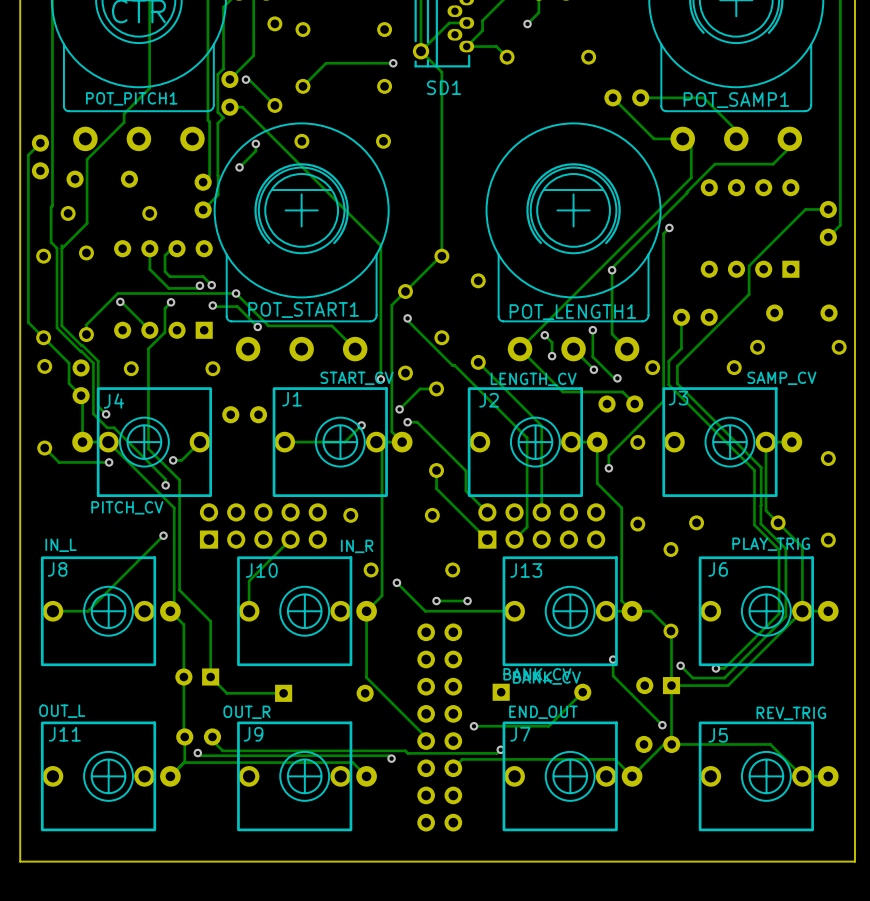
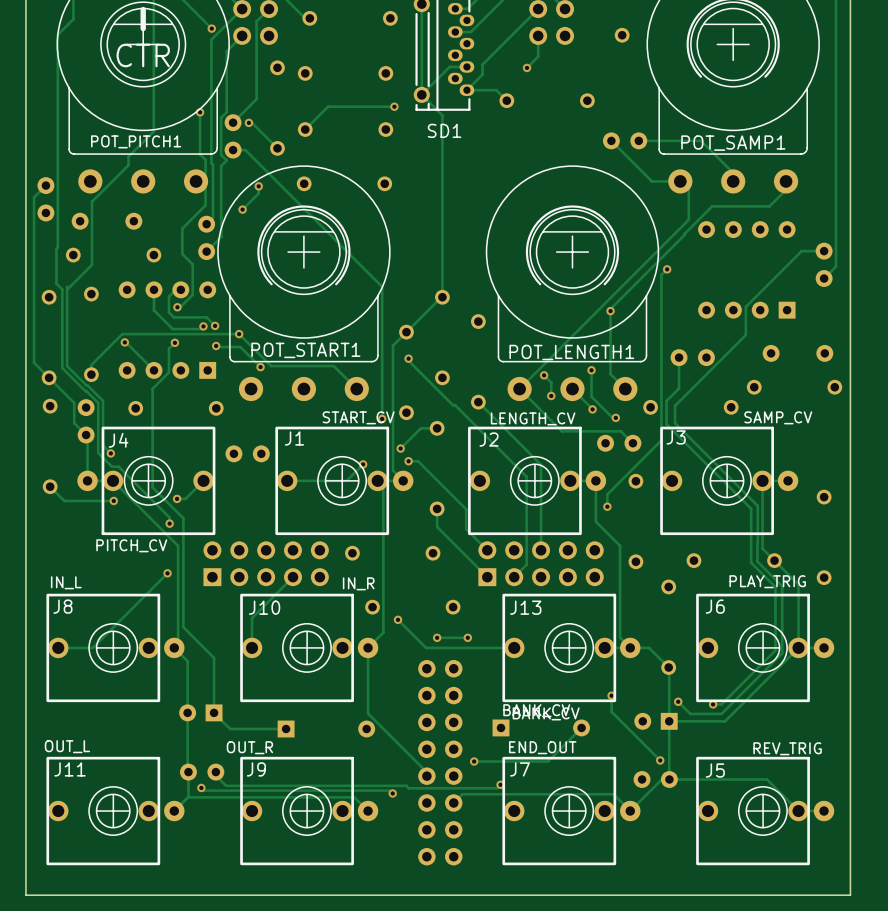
track: none -> (200, 112) (200, 154) (205, 159) (205, 205) (182, 228) (182, 254) (192, 264) (192, 294) (180, 307) (177, 307)
via: none -> (200, 112)
via: none -> (177, 307)

